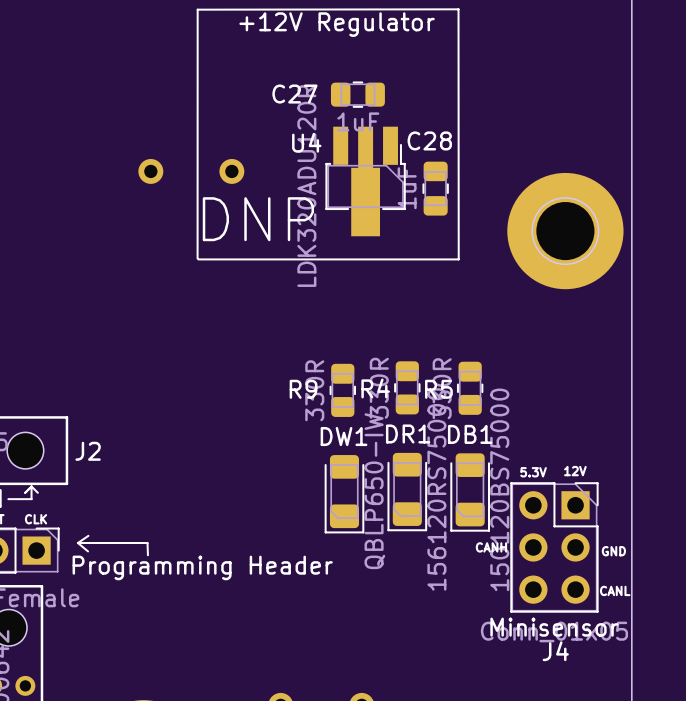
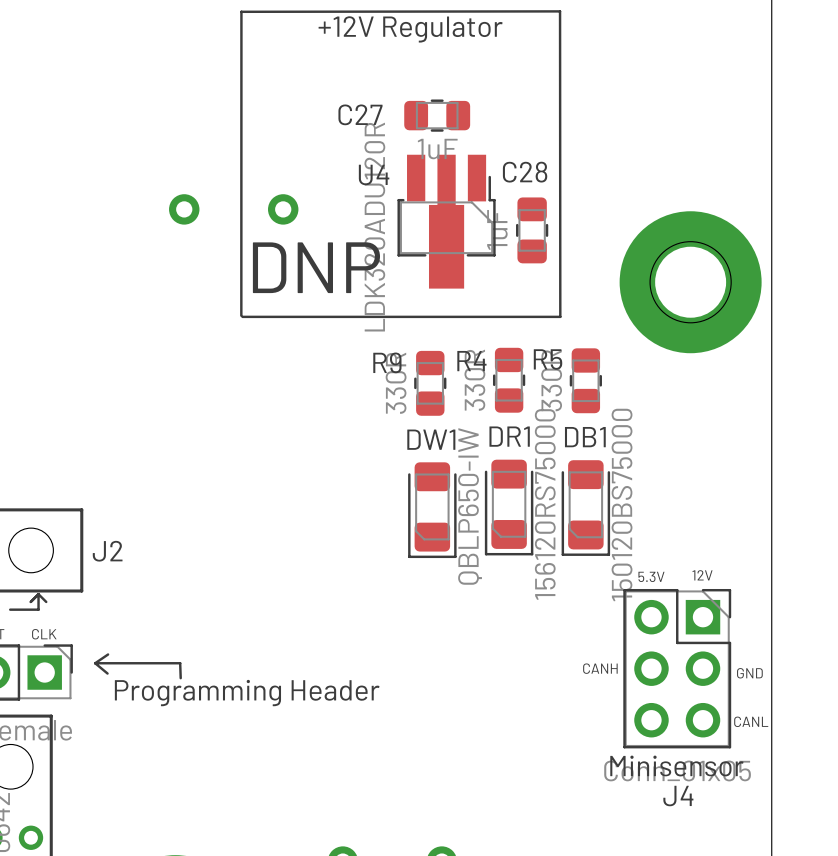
R4 position: (407, 387) -> (509, 380)
R4 name position: R4 (375, 388) -> R4 (471, 361)
R5 position: (470, 388) -> (585, 380)
R9 name position: R9 (303, 389) -> R9 (387, 362)
R5 name position: R5 (438, 389) -> R5 (548, 359)
R9 position: (342, 390) -> (430, 383)
DR1 position: (407, 492) -> (509, 507)
DB1 position: (470, 492) -> (585, 508)
DW1 position: (344, 494) -> (432, 510)

